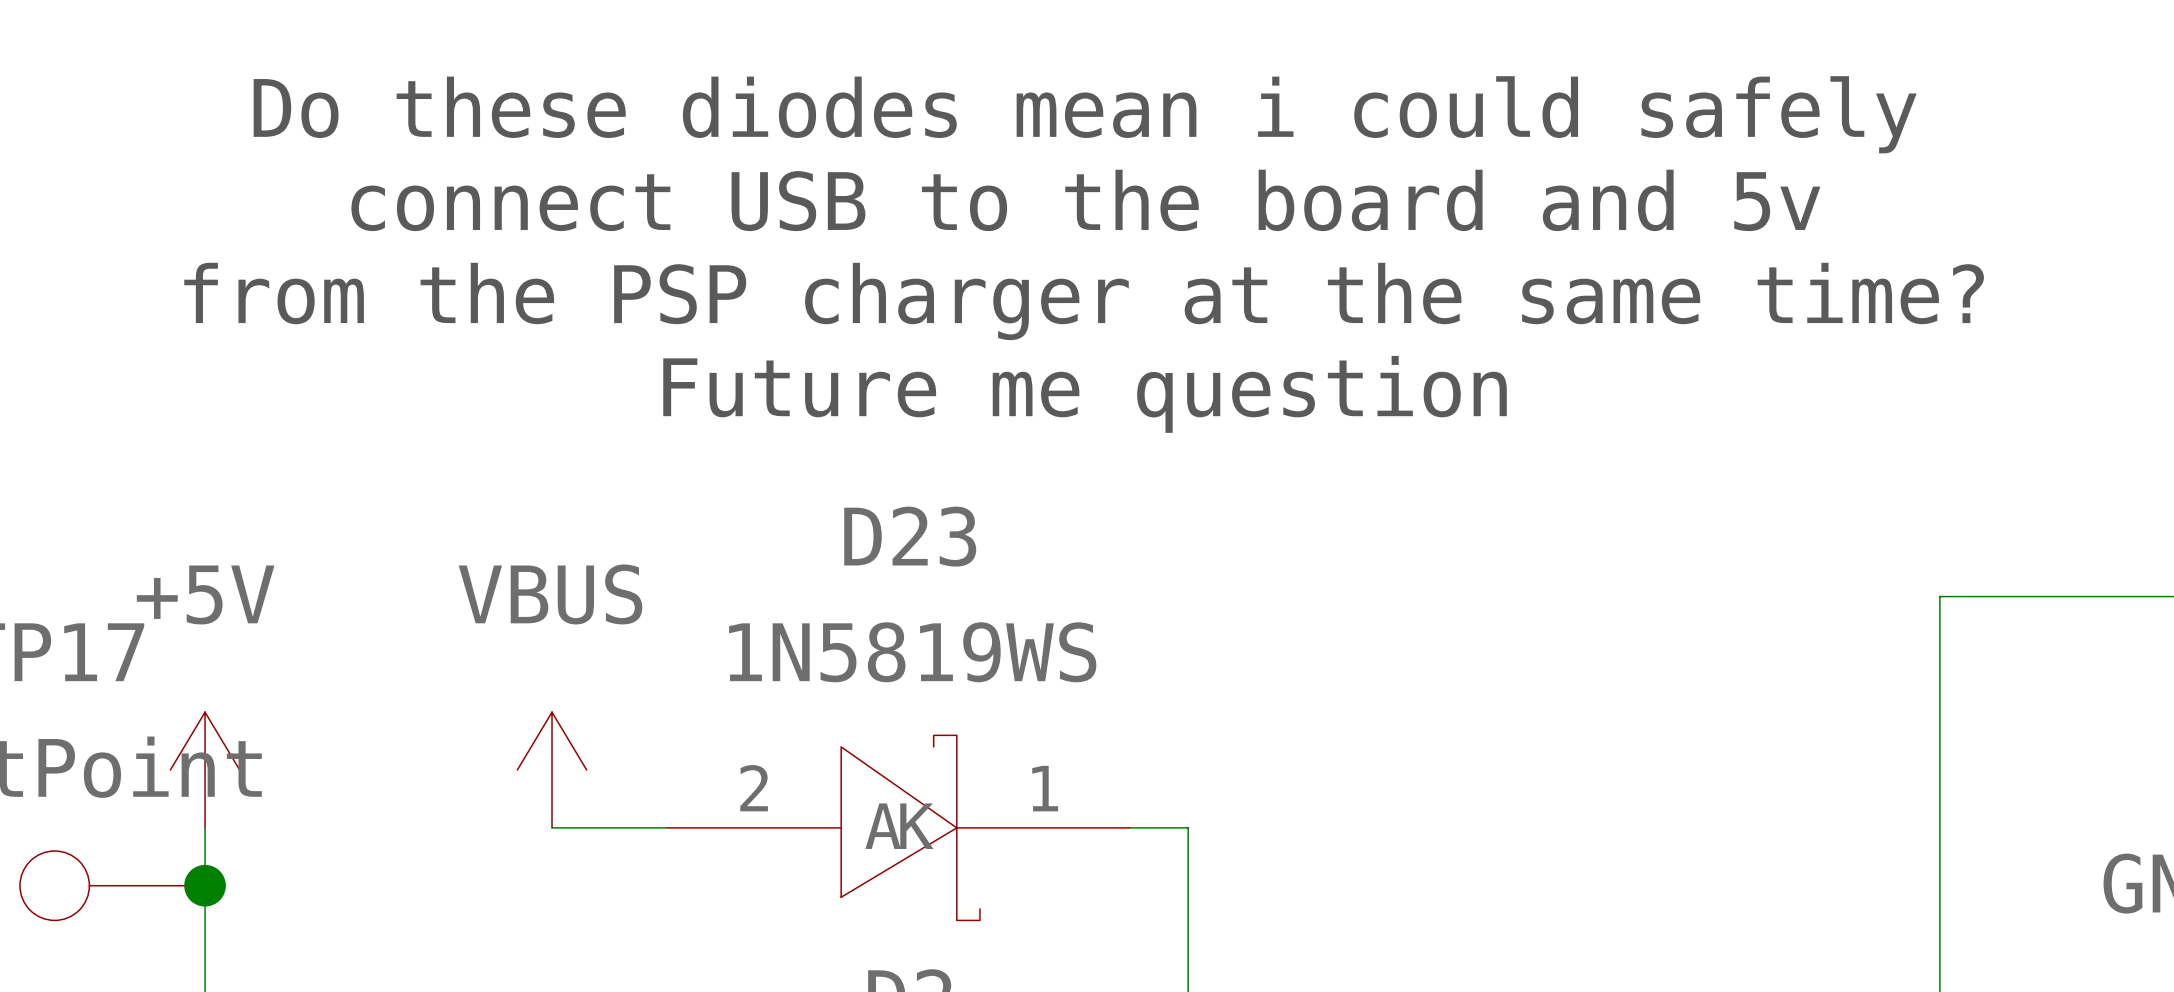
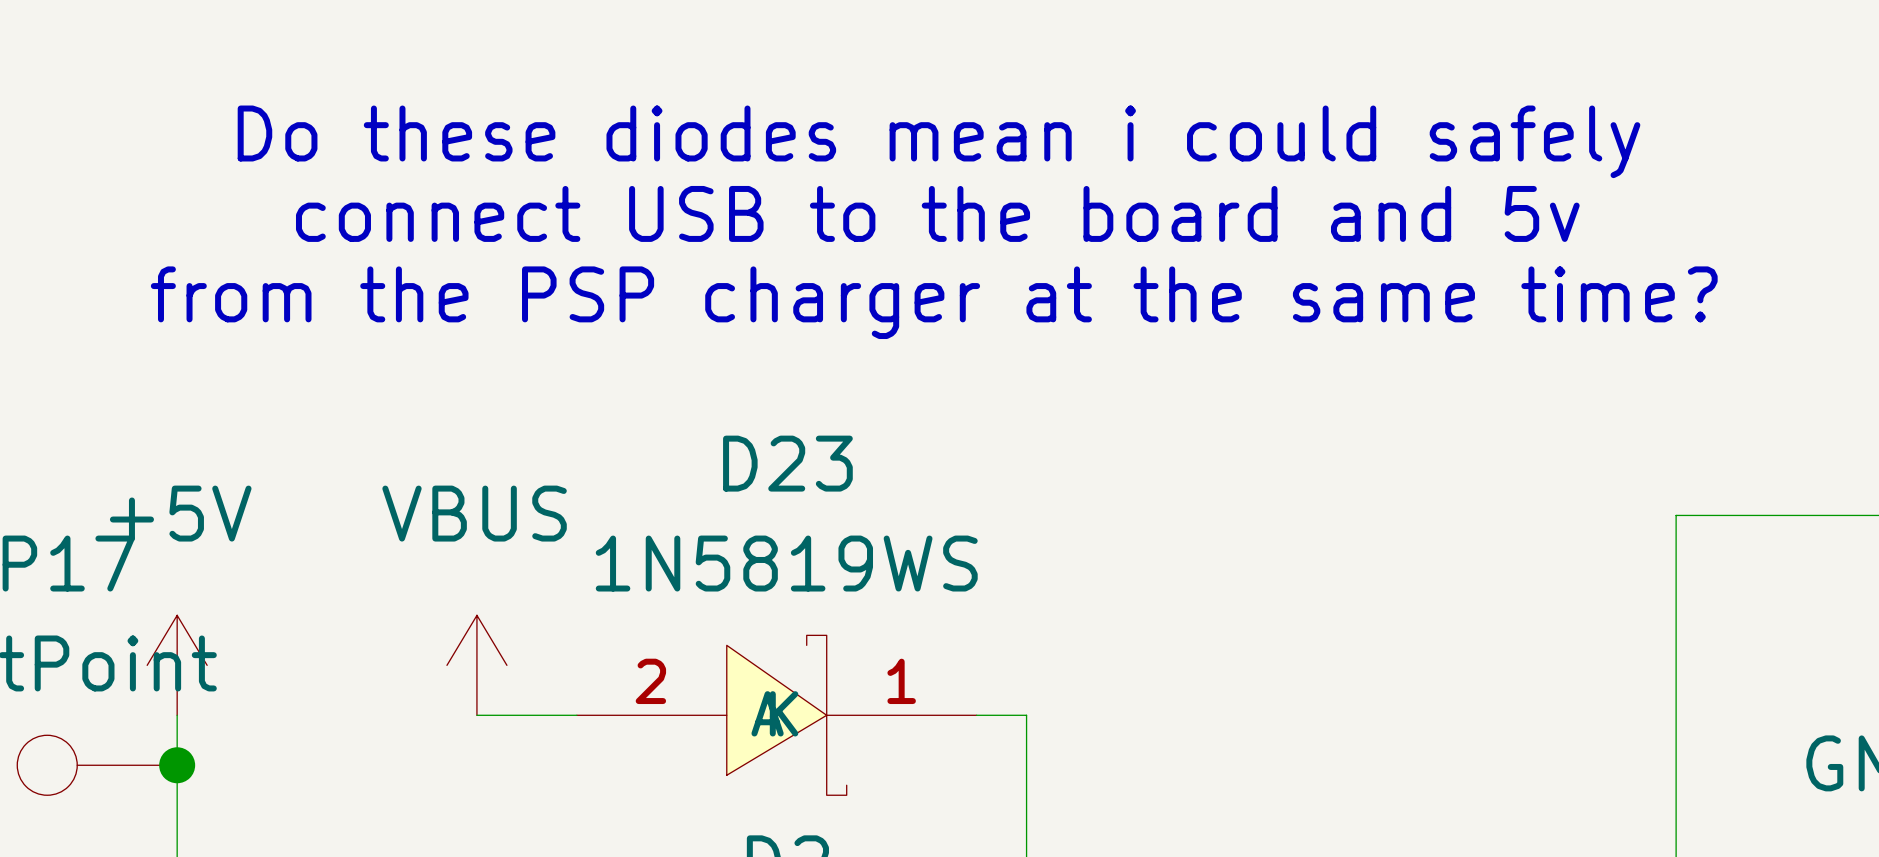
text position: Do these diodes mean i could safely (1085, 114) -> Do these diodes mean i could safely (939, 141)
text position: connect USB to the board and 5v (1085, 200) -> connect USB to the board and 5v (937, 213)
text position: from the PSP charger at the same time? (1084, 301) -> from the PSP charger at the same time? (934, 302)
text: Future me question (1085, 394) -> none

